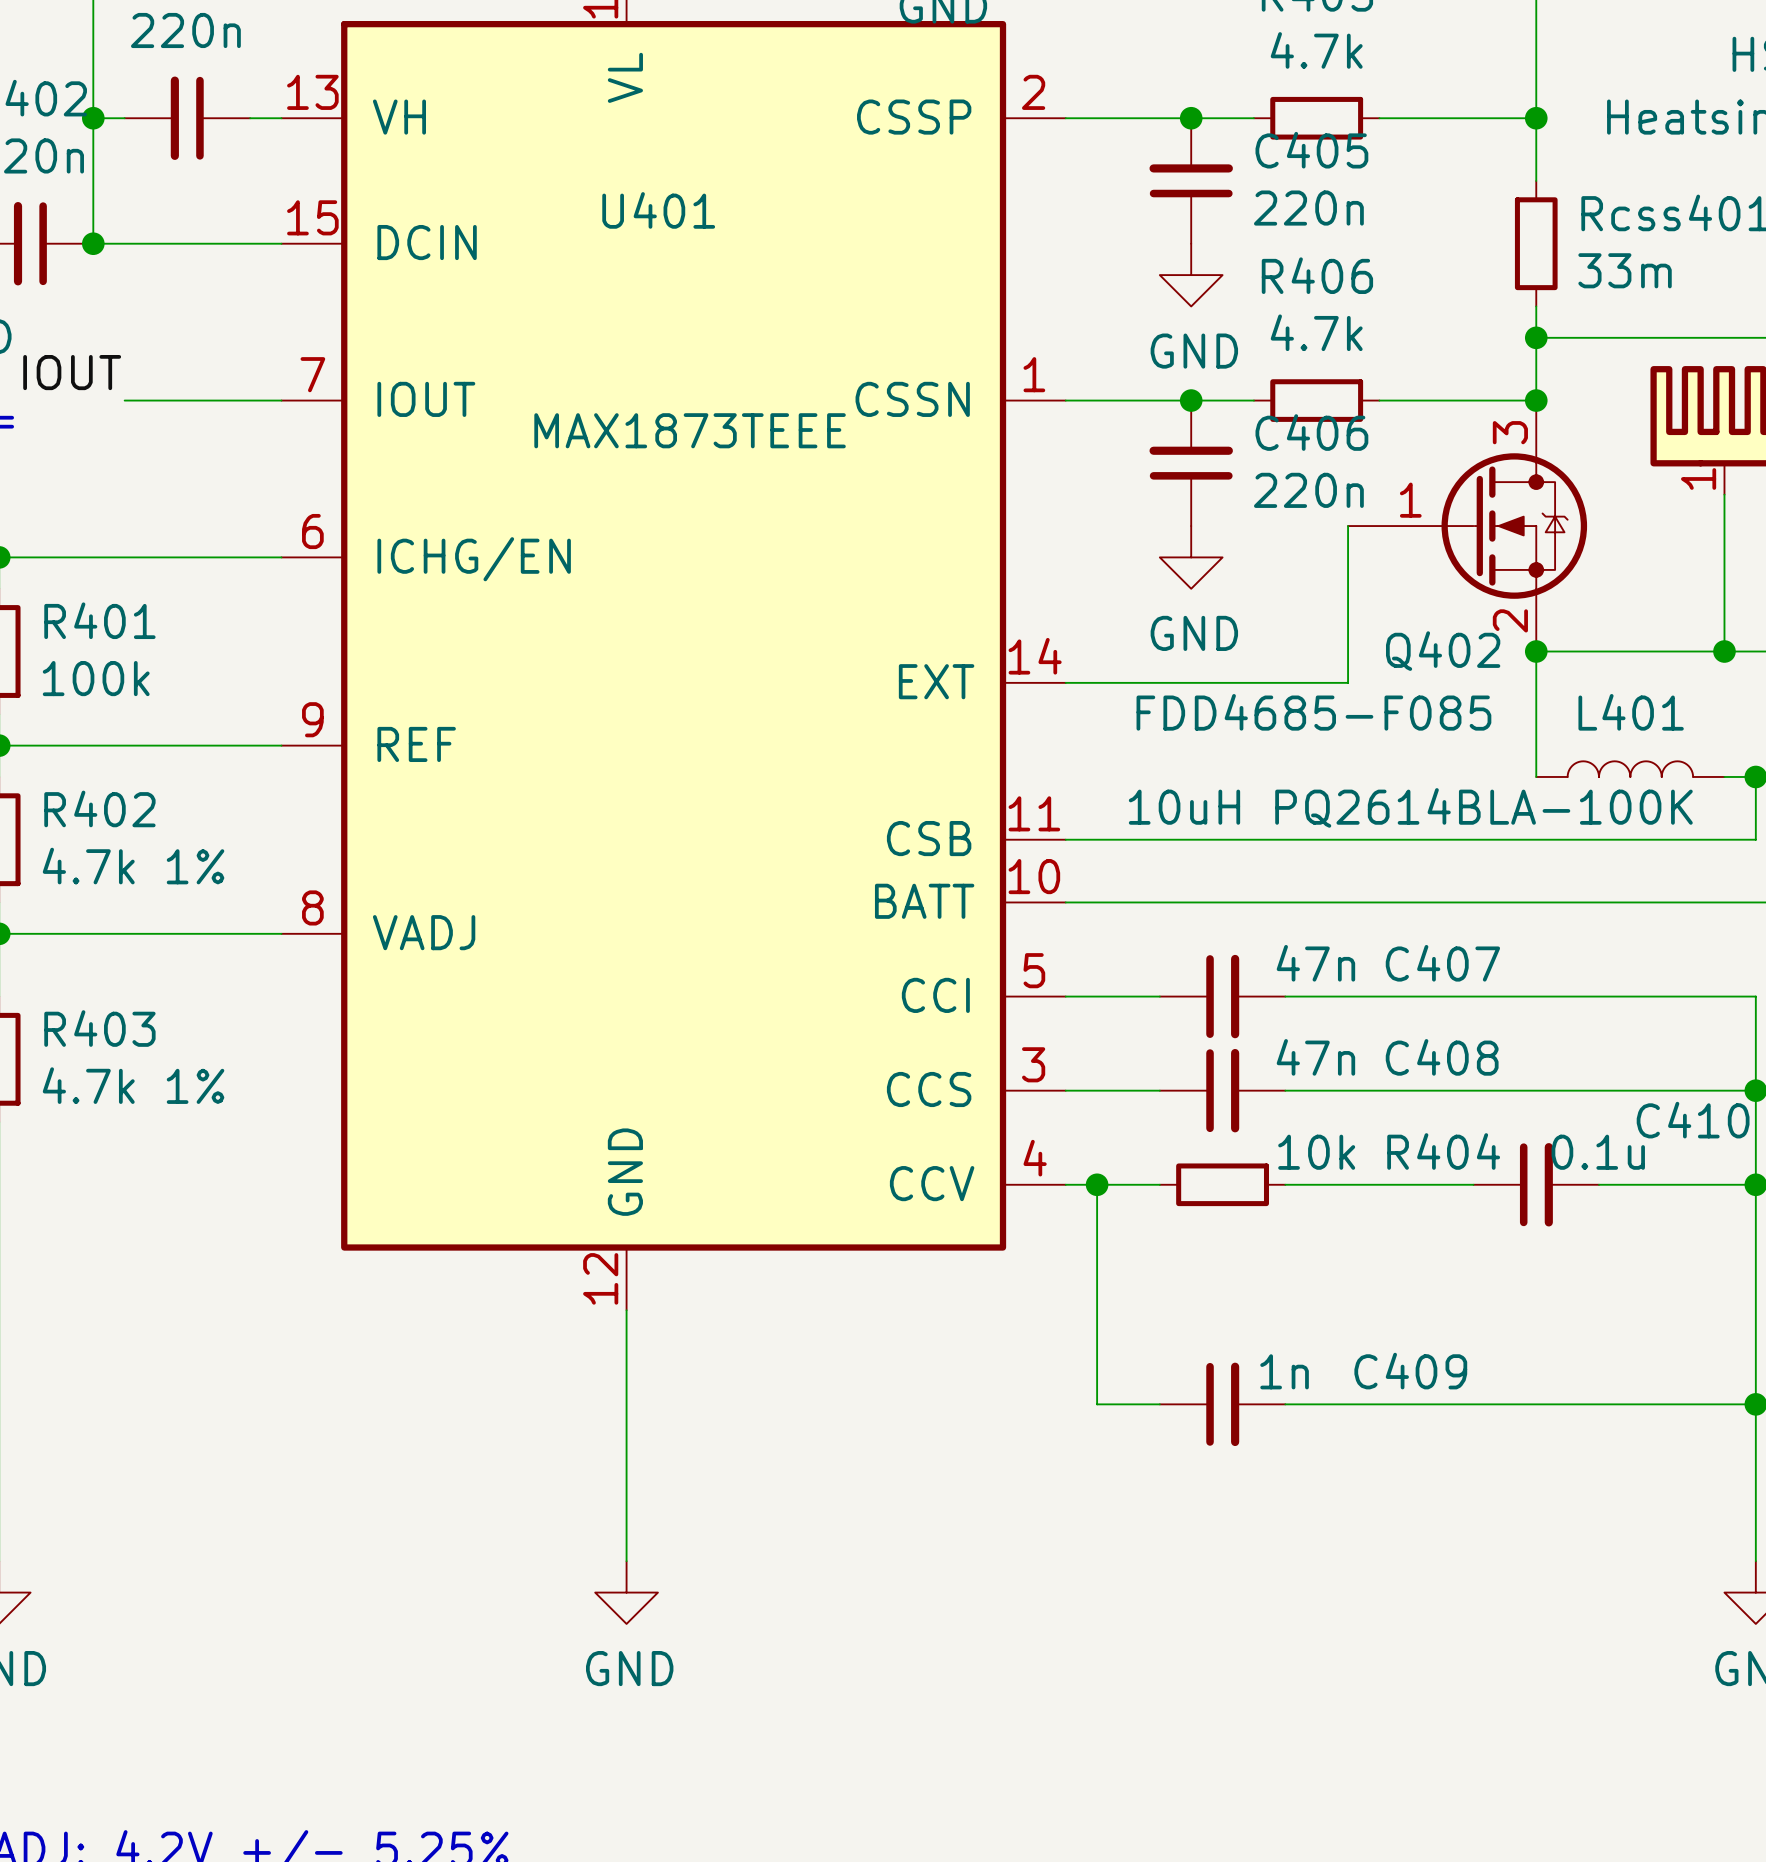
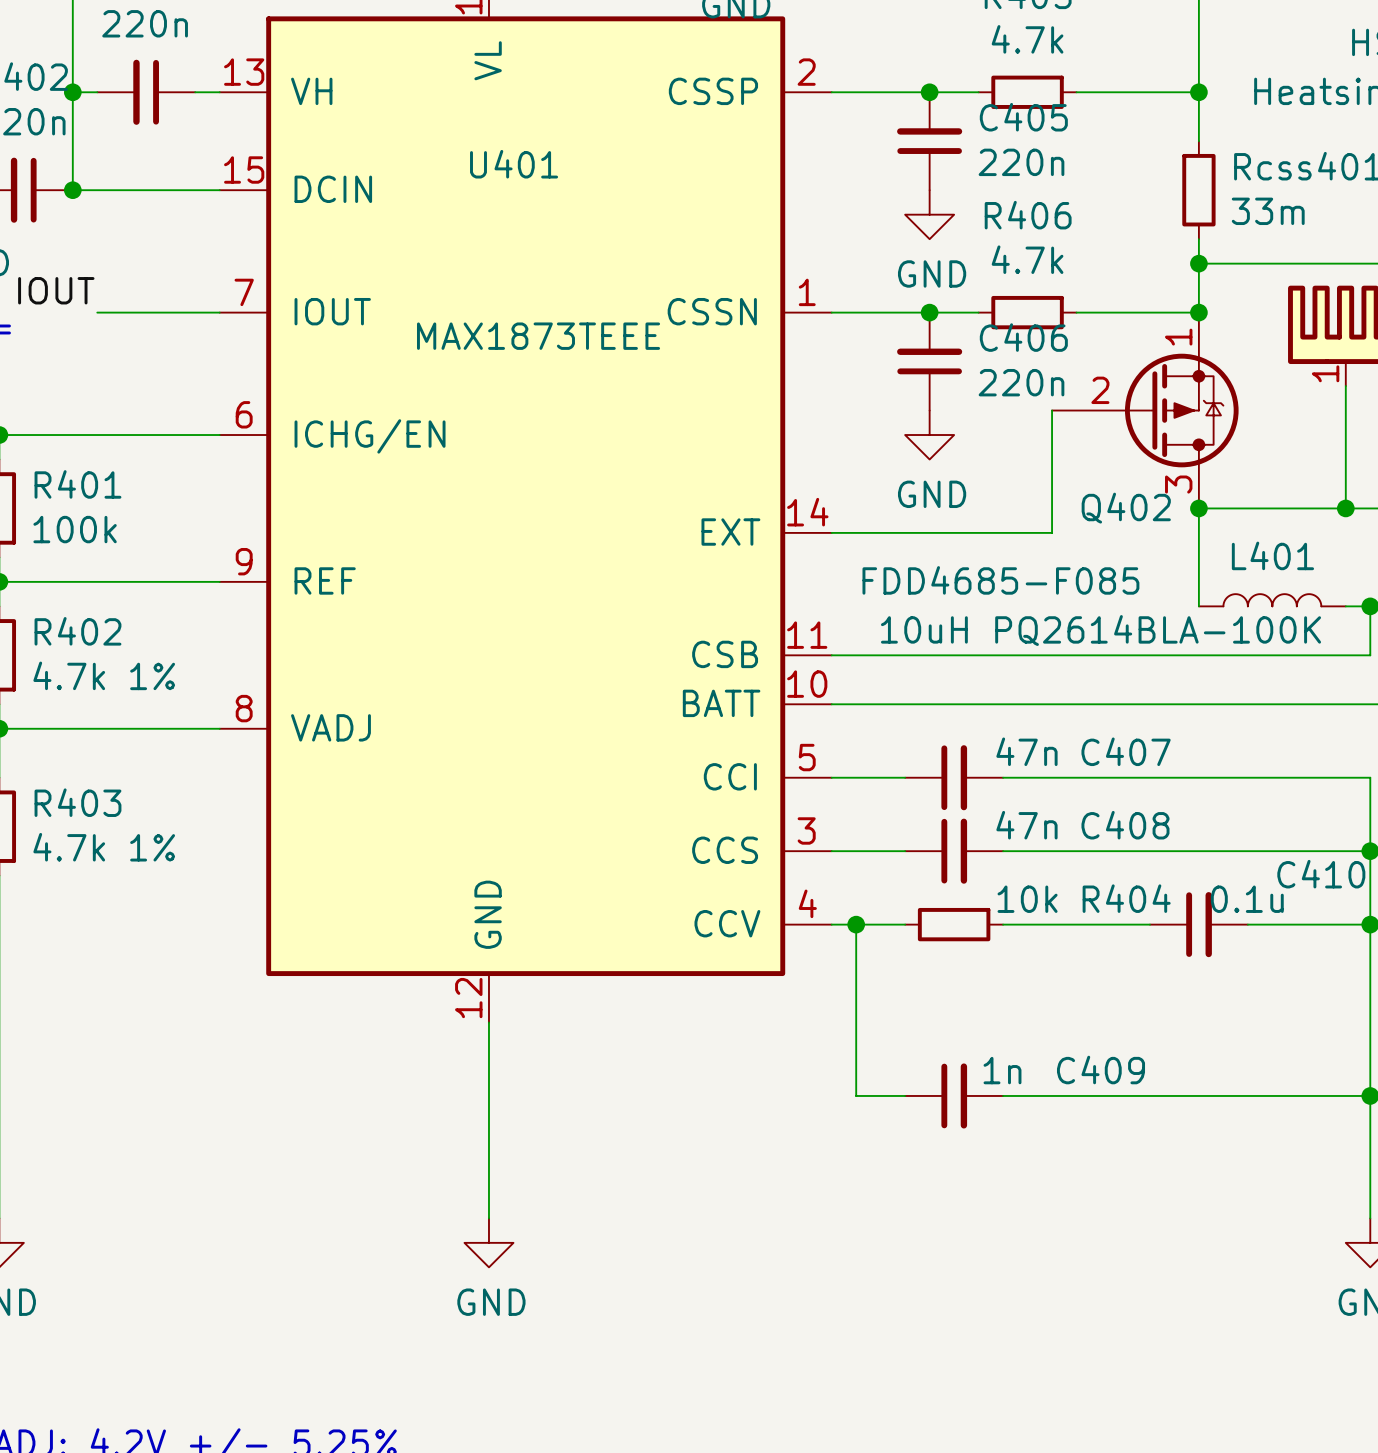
Q402 symbol: [1348, 400, 1588, 652] -> [1052, 312, 1239, 509]

